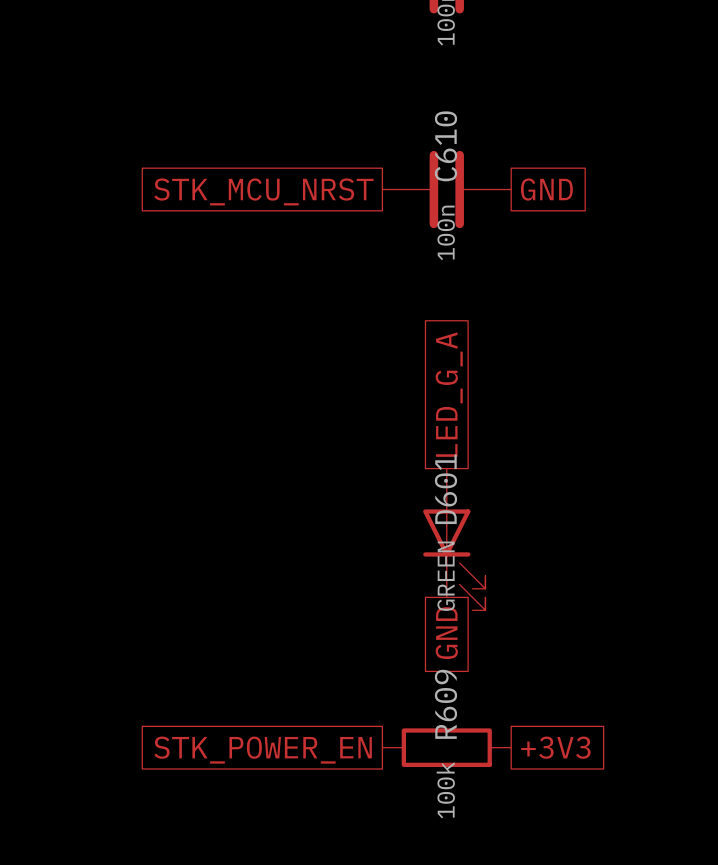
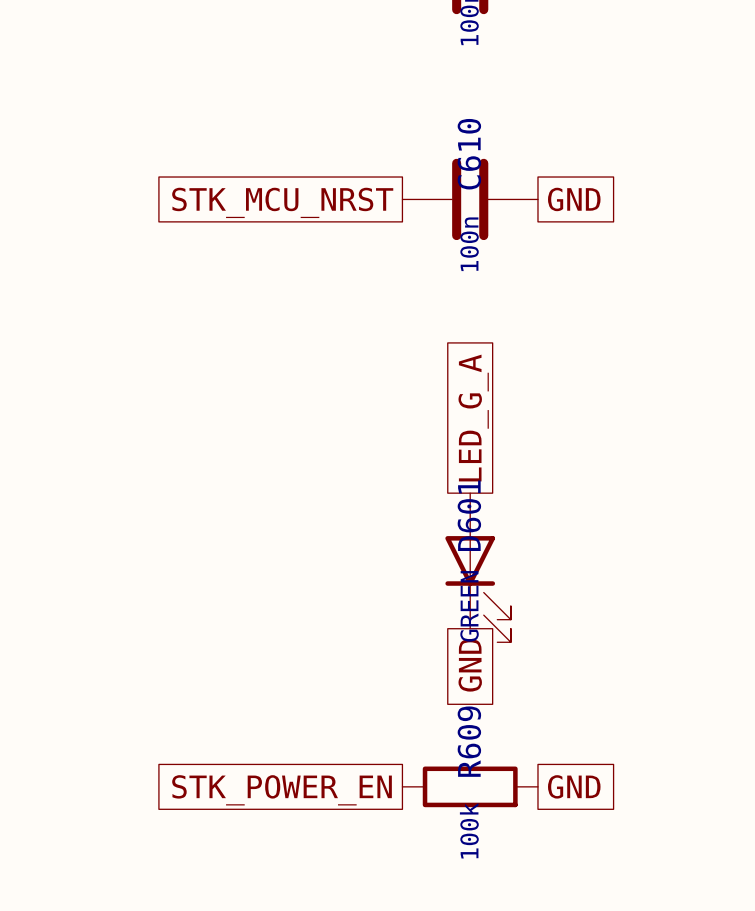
global label: +3V3 (555, 747) -> GND (574, 786)

